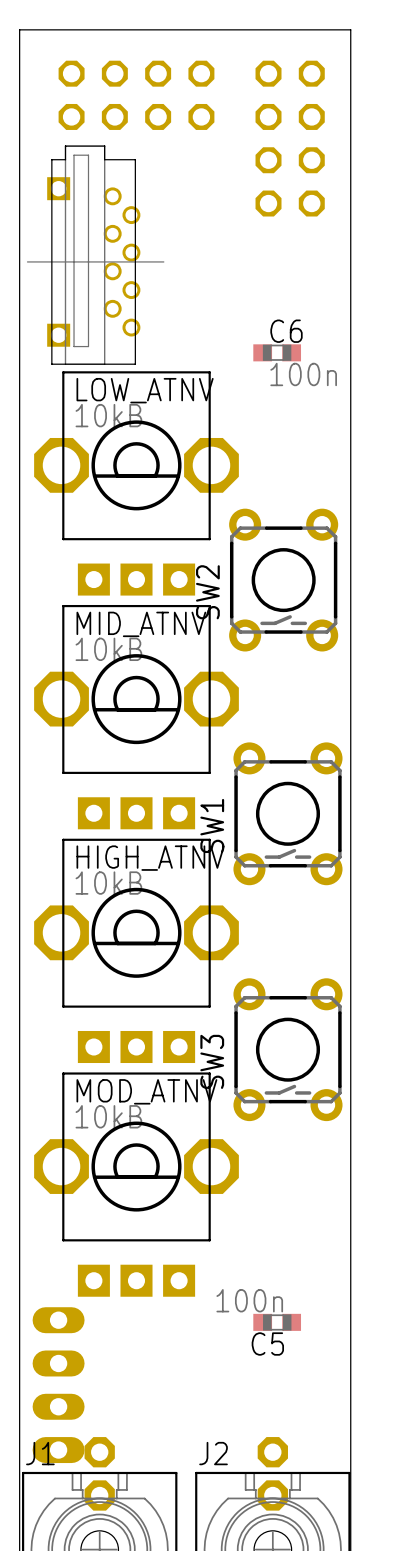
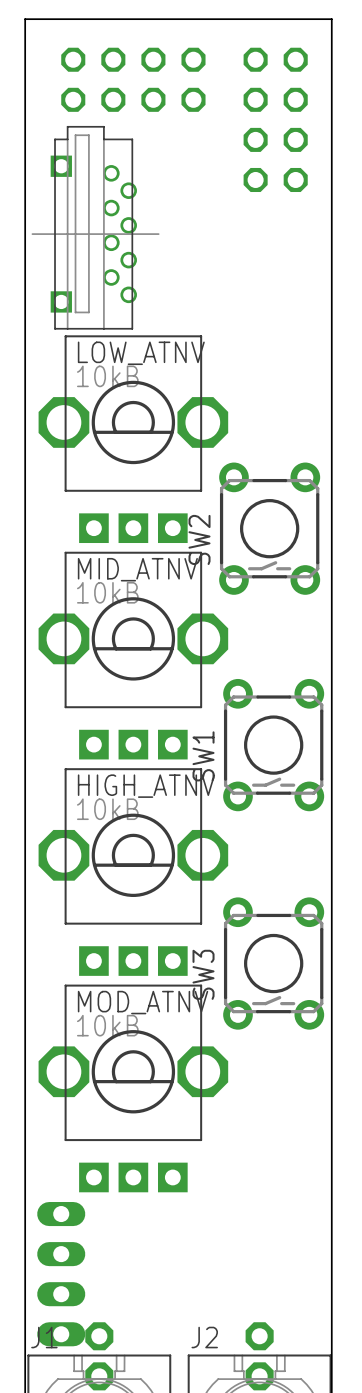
C6: 100n (277, 352) -> none
C5: 100n (277, 1322) -> none

